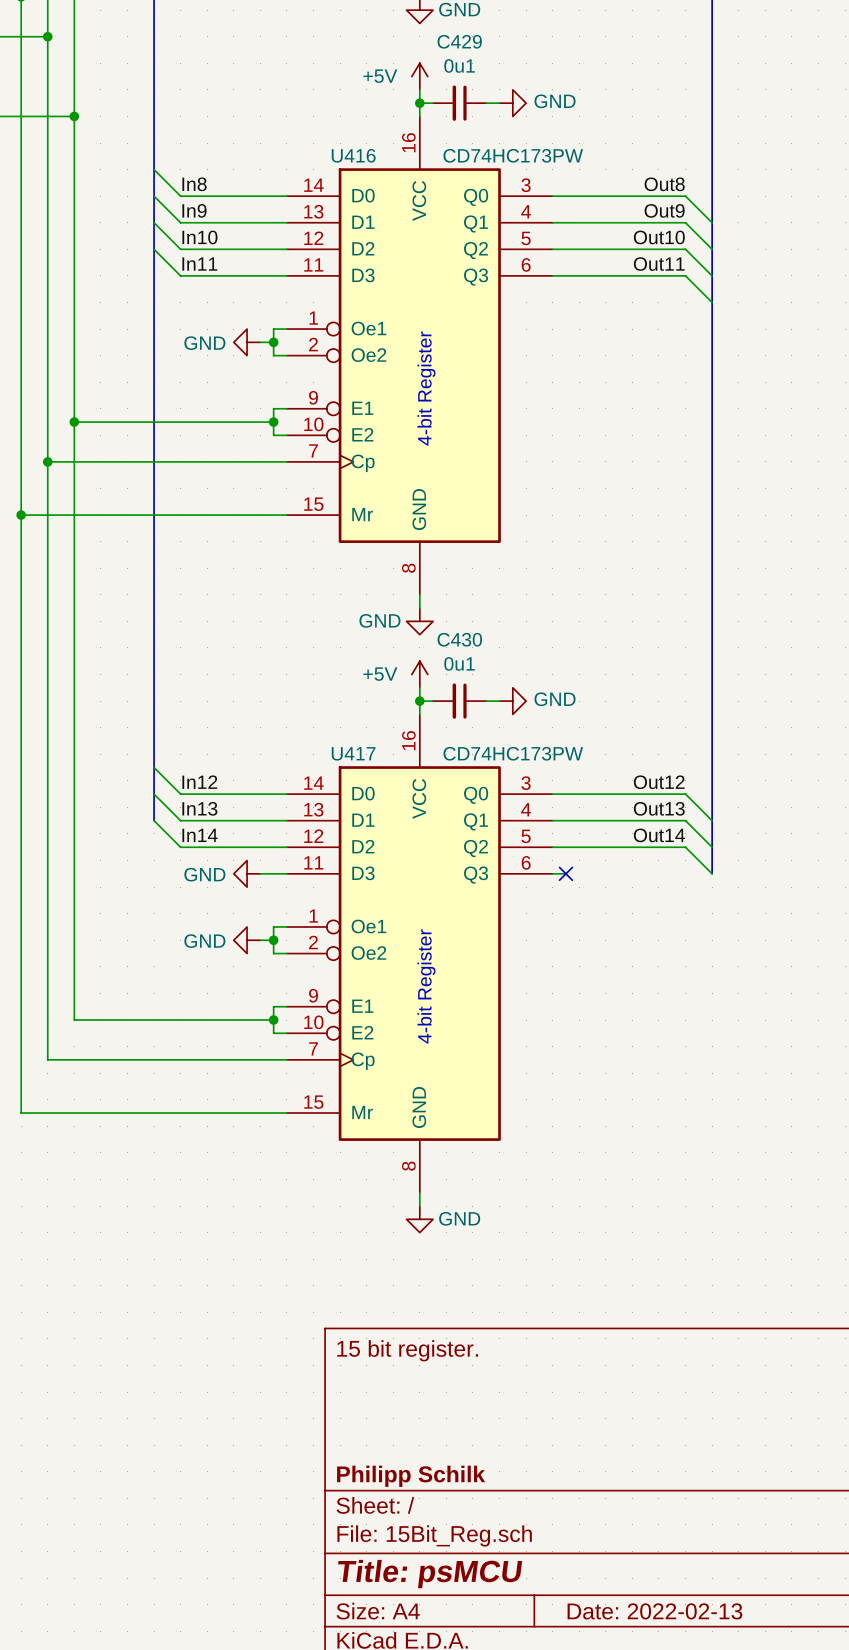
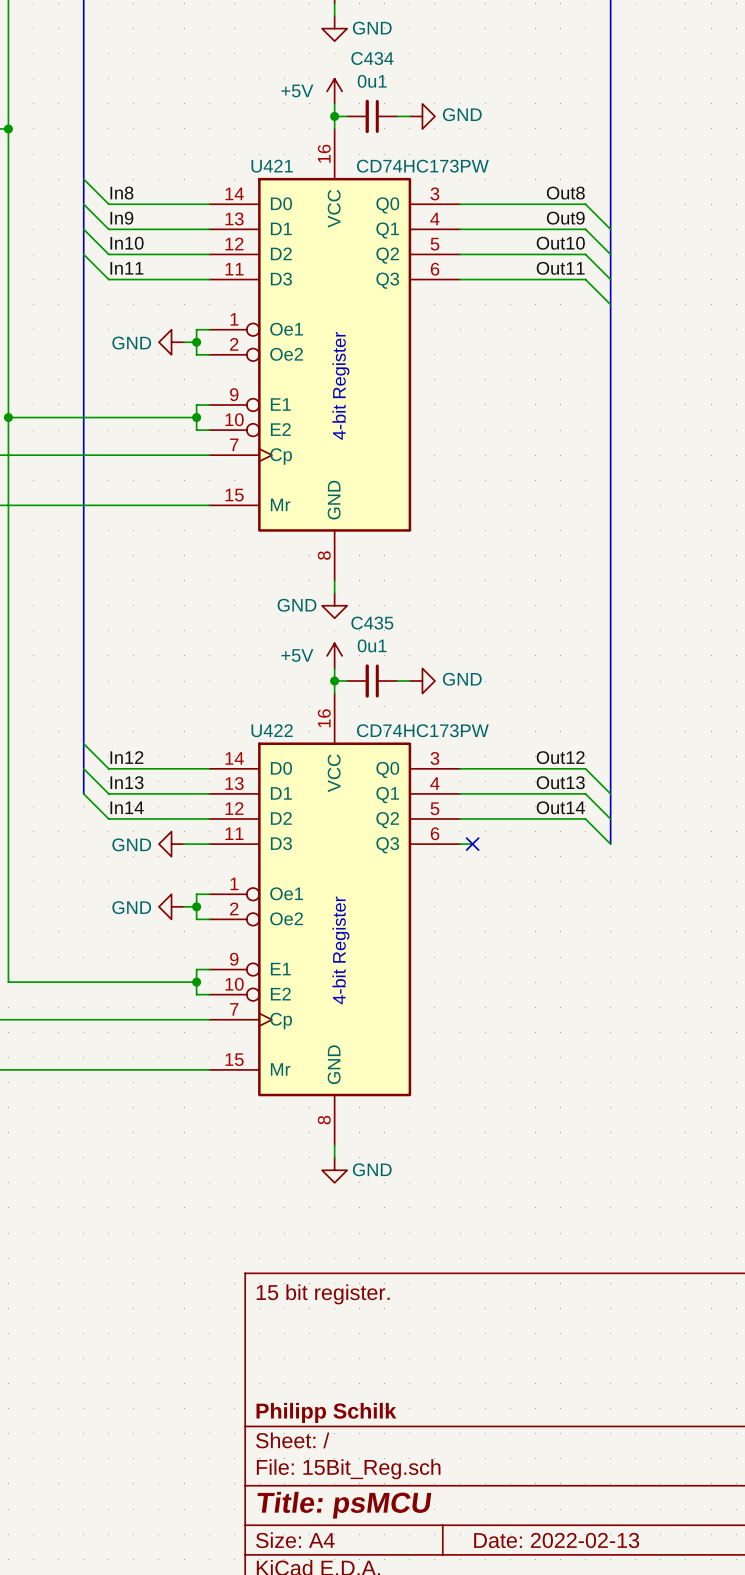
C429 name: C429 (459, 41) -> C434 (372, 58)
U416 name: U416 (353, 155) -> U421 (272, 166)
C430 name: C430 (459, 639) -> C435 (372, 623)
U417 name: U417 (353, 753) -> U422 (272, 730)

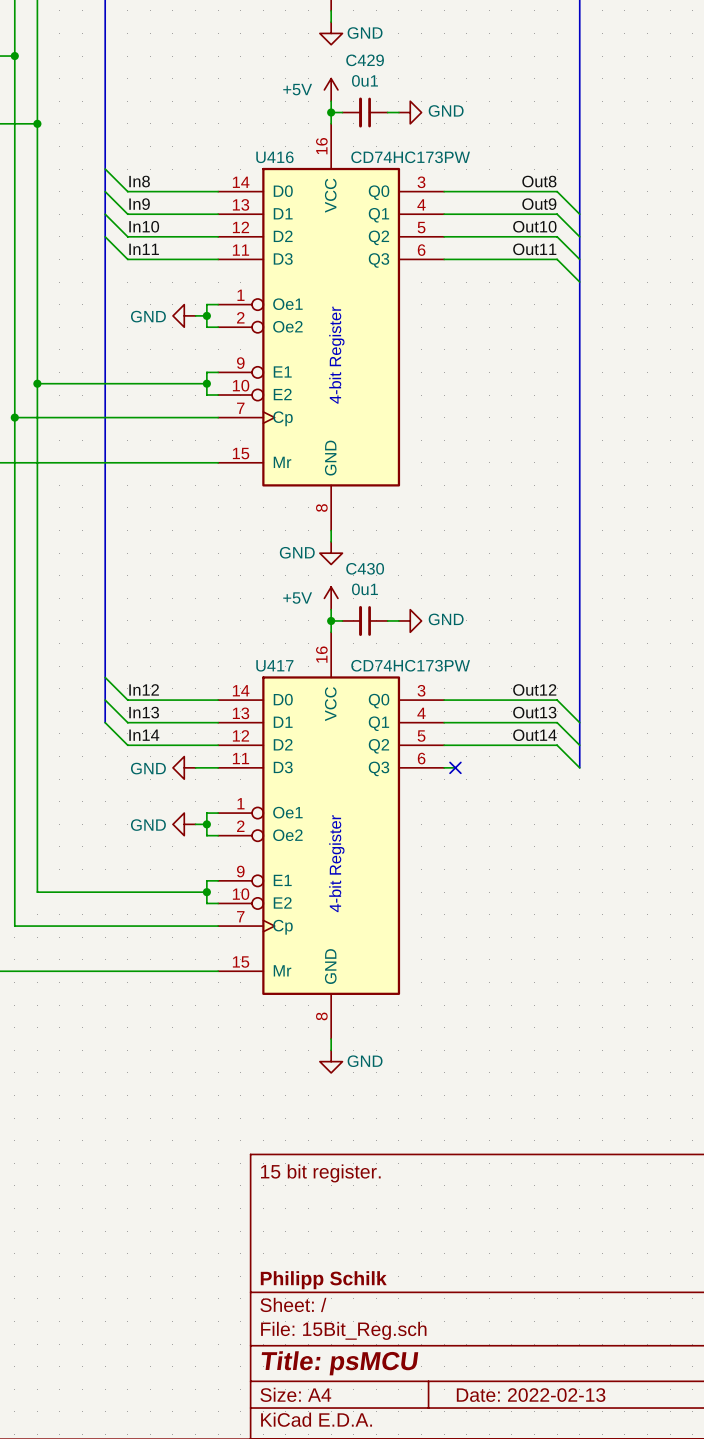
C434 name: C434 (372, 58) -> C429 (365, 60)
U421 name: U421 (272, 166) -> U416 (274, 157)
C435 name: C435 (372, 623) -> C430 (365, 568)
U422 name: U422 (272, 730) -> U417 (274, 665)

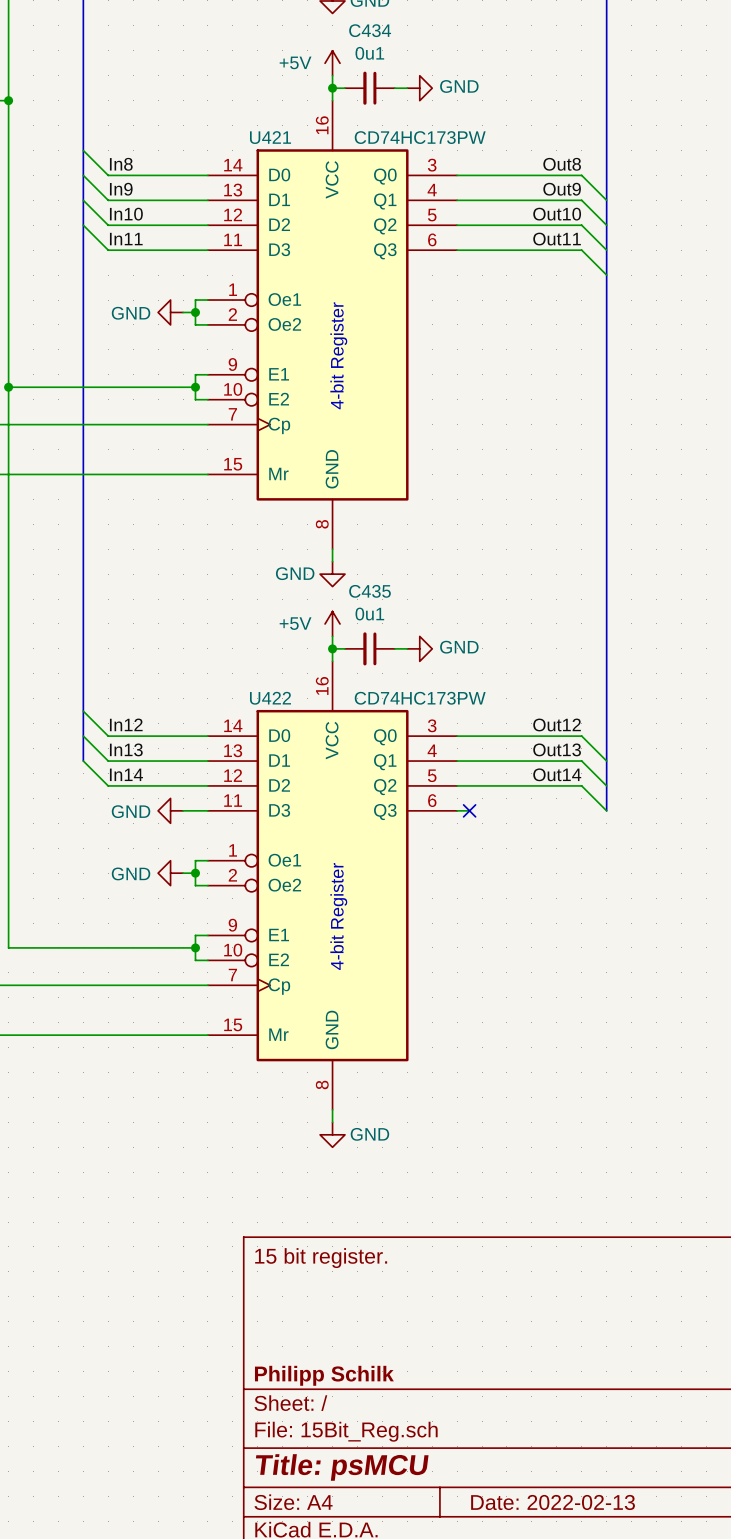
C429 name: C429 (365, 60) -> C434 (370, 30)
U416 name: U416 (274, 157) -> U421 (270, 137)
C430 name: C430 (365, 568) -> C435 (370, 591)
U417 name: U417 (274, 665) -> U422 (270, 698)

